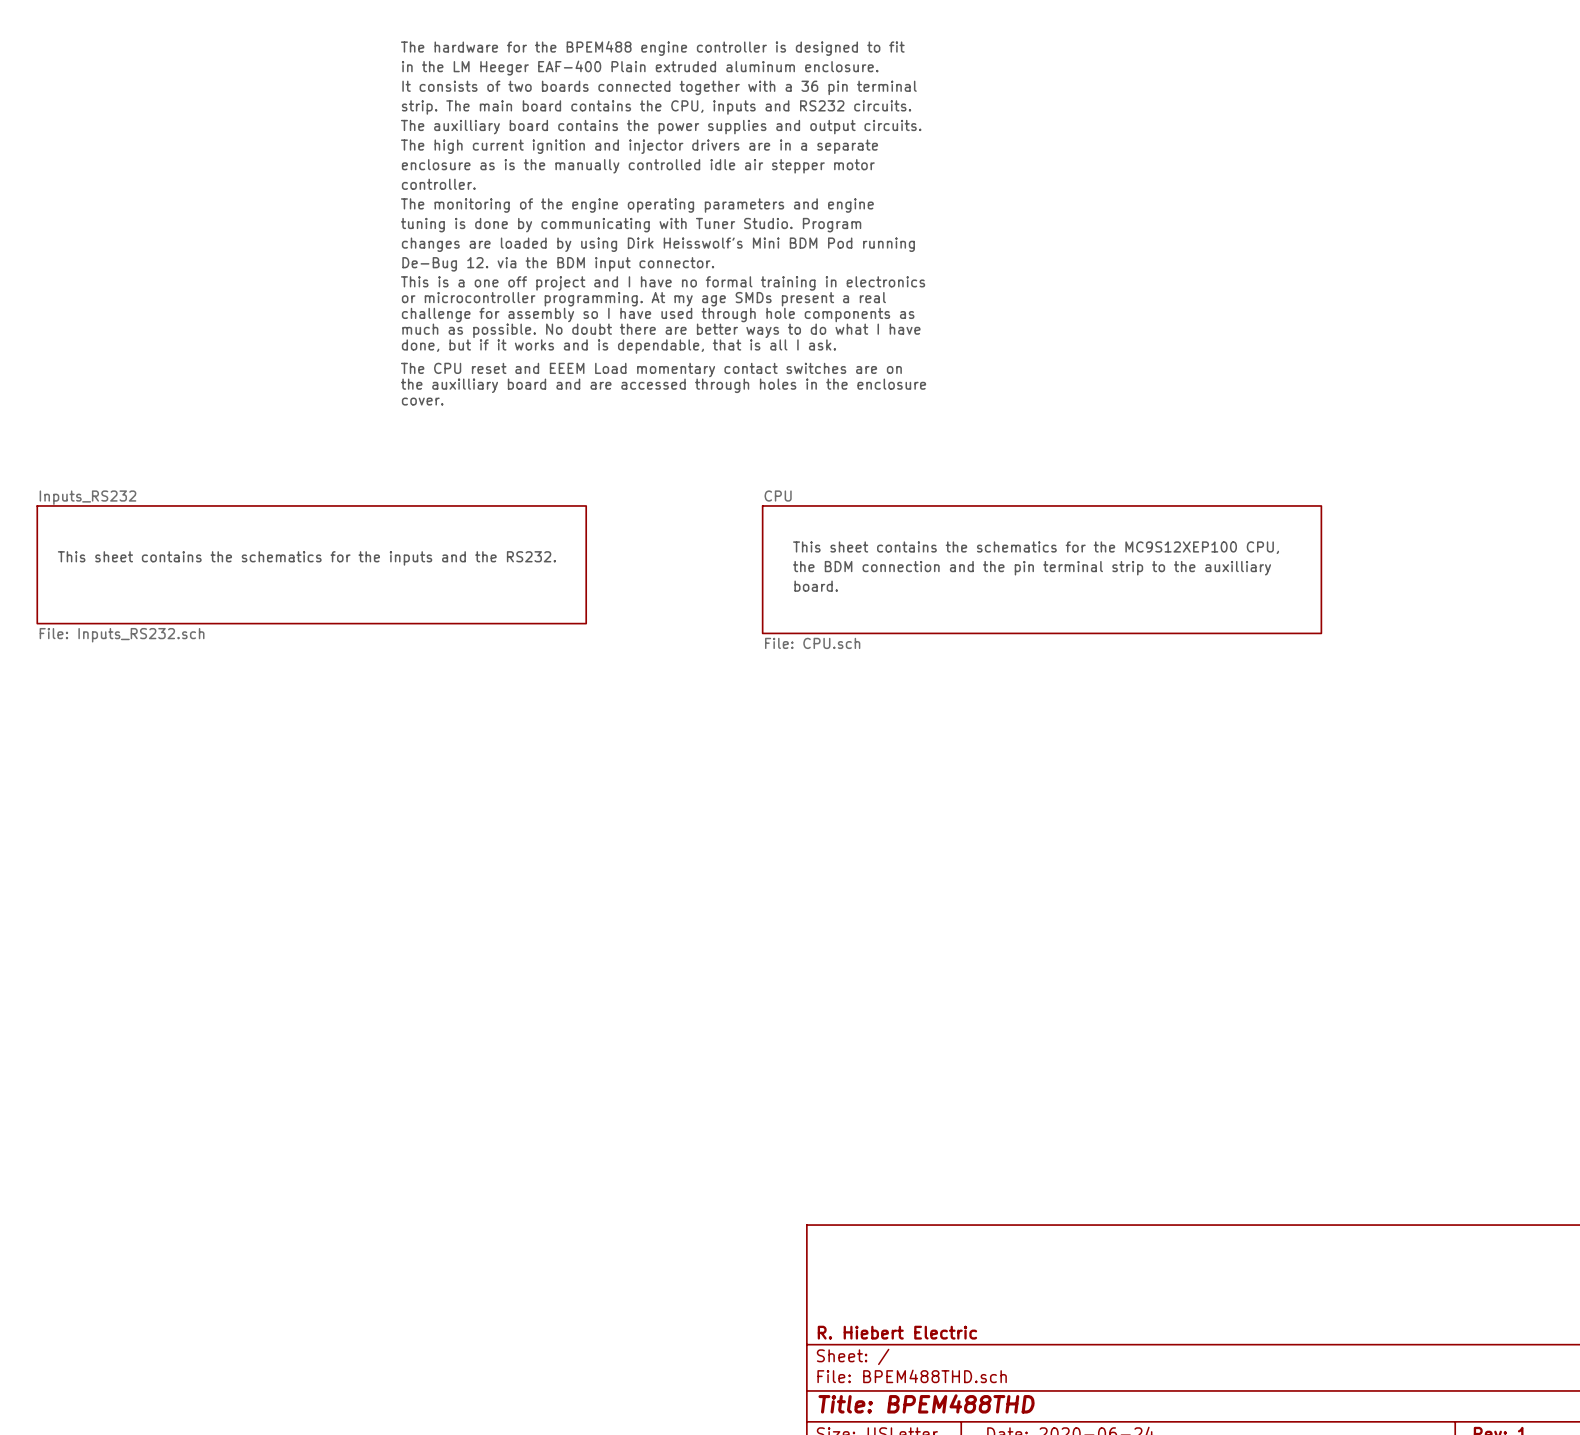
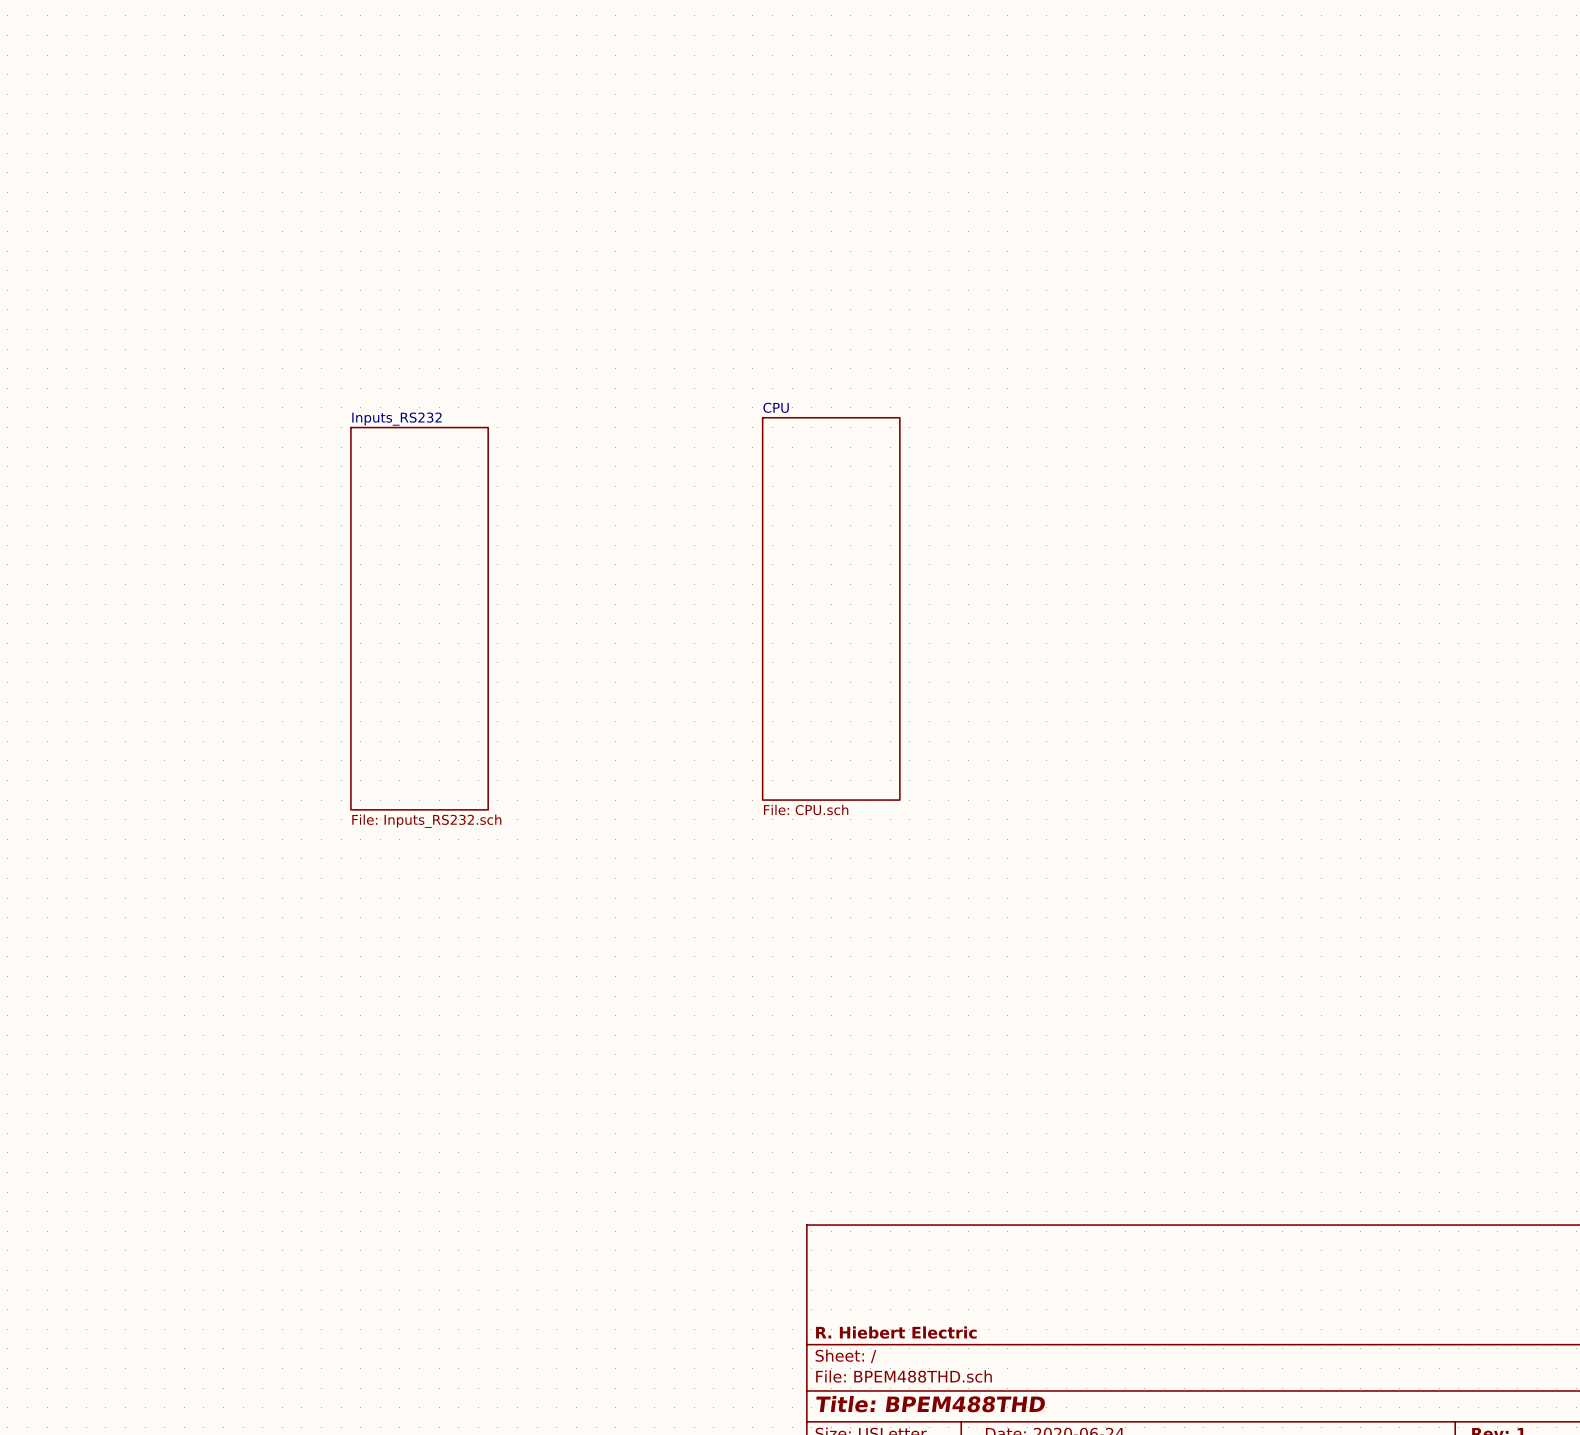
text: The hardware for the BPEM488 engine controller is designed to fit (652, 48) -> none
text: in the LM Heeger EAF-400 Plain extruded aluminum enclosure. (640, 68) -> none
text: It consists of two boards connected together with a 36 pin terminal (659, 87) -> none
text: strip. The main board contains the CPU, inputs and RS232 circuits. (656, 107) -> none
text: The auxilliary board contains the power supplies and output circuits. (661, 127) -> none
text: The high current ignition and injector drivers are in a separate (639, 146) -> none
text: enclosure as is the manually controlled idle air stepper motor (638, 166) -> none
text: controller. (438, 184) -> none
text: The monitoring of the engine operating parameters and engine (637, 205) -> none
text: tuning is done by communicating with Tuner Studio. Program (631, 225) -> none
text: changes are loaded by using Dirk Heisswolf's Mini BDM Pod running (658, 244) -> none
text: De-Bug 12. via the BDM input connector. (558, 264) -> none
text: This is a one off project and I have no formal training in electronics (663, 283) -> none
text: or microcontroller programming. At my age SMDs present a real (643, 299) -> none
text: challenge for assembly so I have used through hole components as (658, 315) -> none
text: much as possible. No doubt there are better ways to do what I have (661, 330) -> none
text: done, but if it works and is dependable, that is all I ask. (618, 346) -> none
text: The CPU reset and EEEM Load momentary contact switches are on (651, 370) -> none
text: the auxilliary board and are accessed through holes in the enclosure (663, 385) -> none
text: cover. (422, 401) -> none
sheet Inputs_RS232 name position: Inputs_RS232 (87, 497) -> Inputs_RS232 (396, 419)
sheet Inputs_RS232 shape: [37, 505, 587, 624] -> [350, 427, 489, 810]
text: This sheet contains the schematics for the MC9S12XEP100 CPU, (1036, 547) -> none
text: This sheet contains the schematics for the inputs and the RS232. (306, 558) -> none
text: the BDM connection and the pin terminal strip to the auxilliary (1032, 568) -> none
sheet CPU: File: CPU.sch (1042, 569) -> none
text: board. (816, 586) -> none
sheet CPU: none -> File: CPU.sch (831, 608)
sheet Inputs_RS232 value position: File: Inputs_RS232.sch (122, 635) -> File: Inputs_RS232.sch (426, 821)

